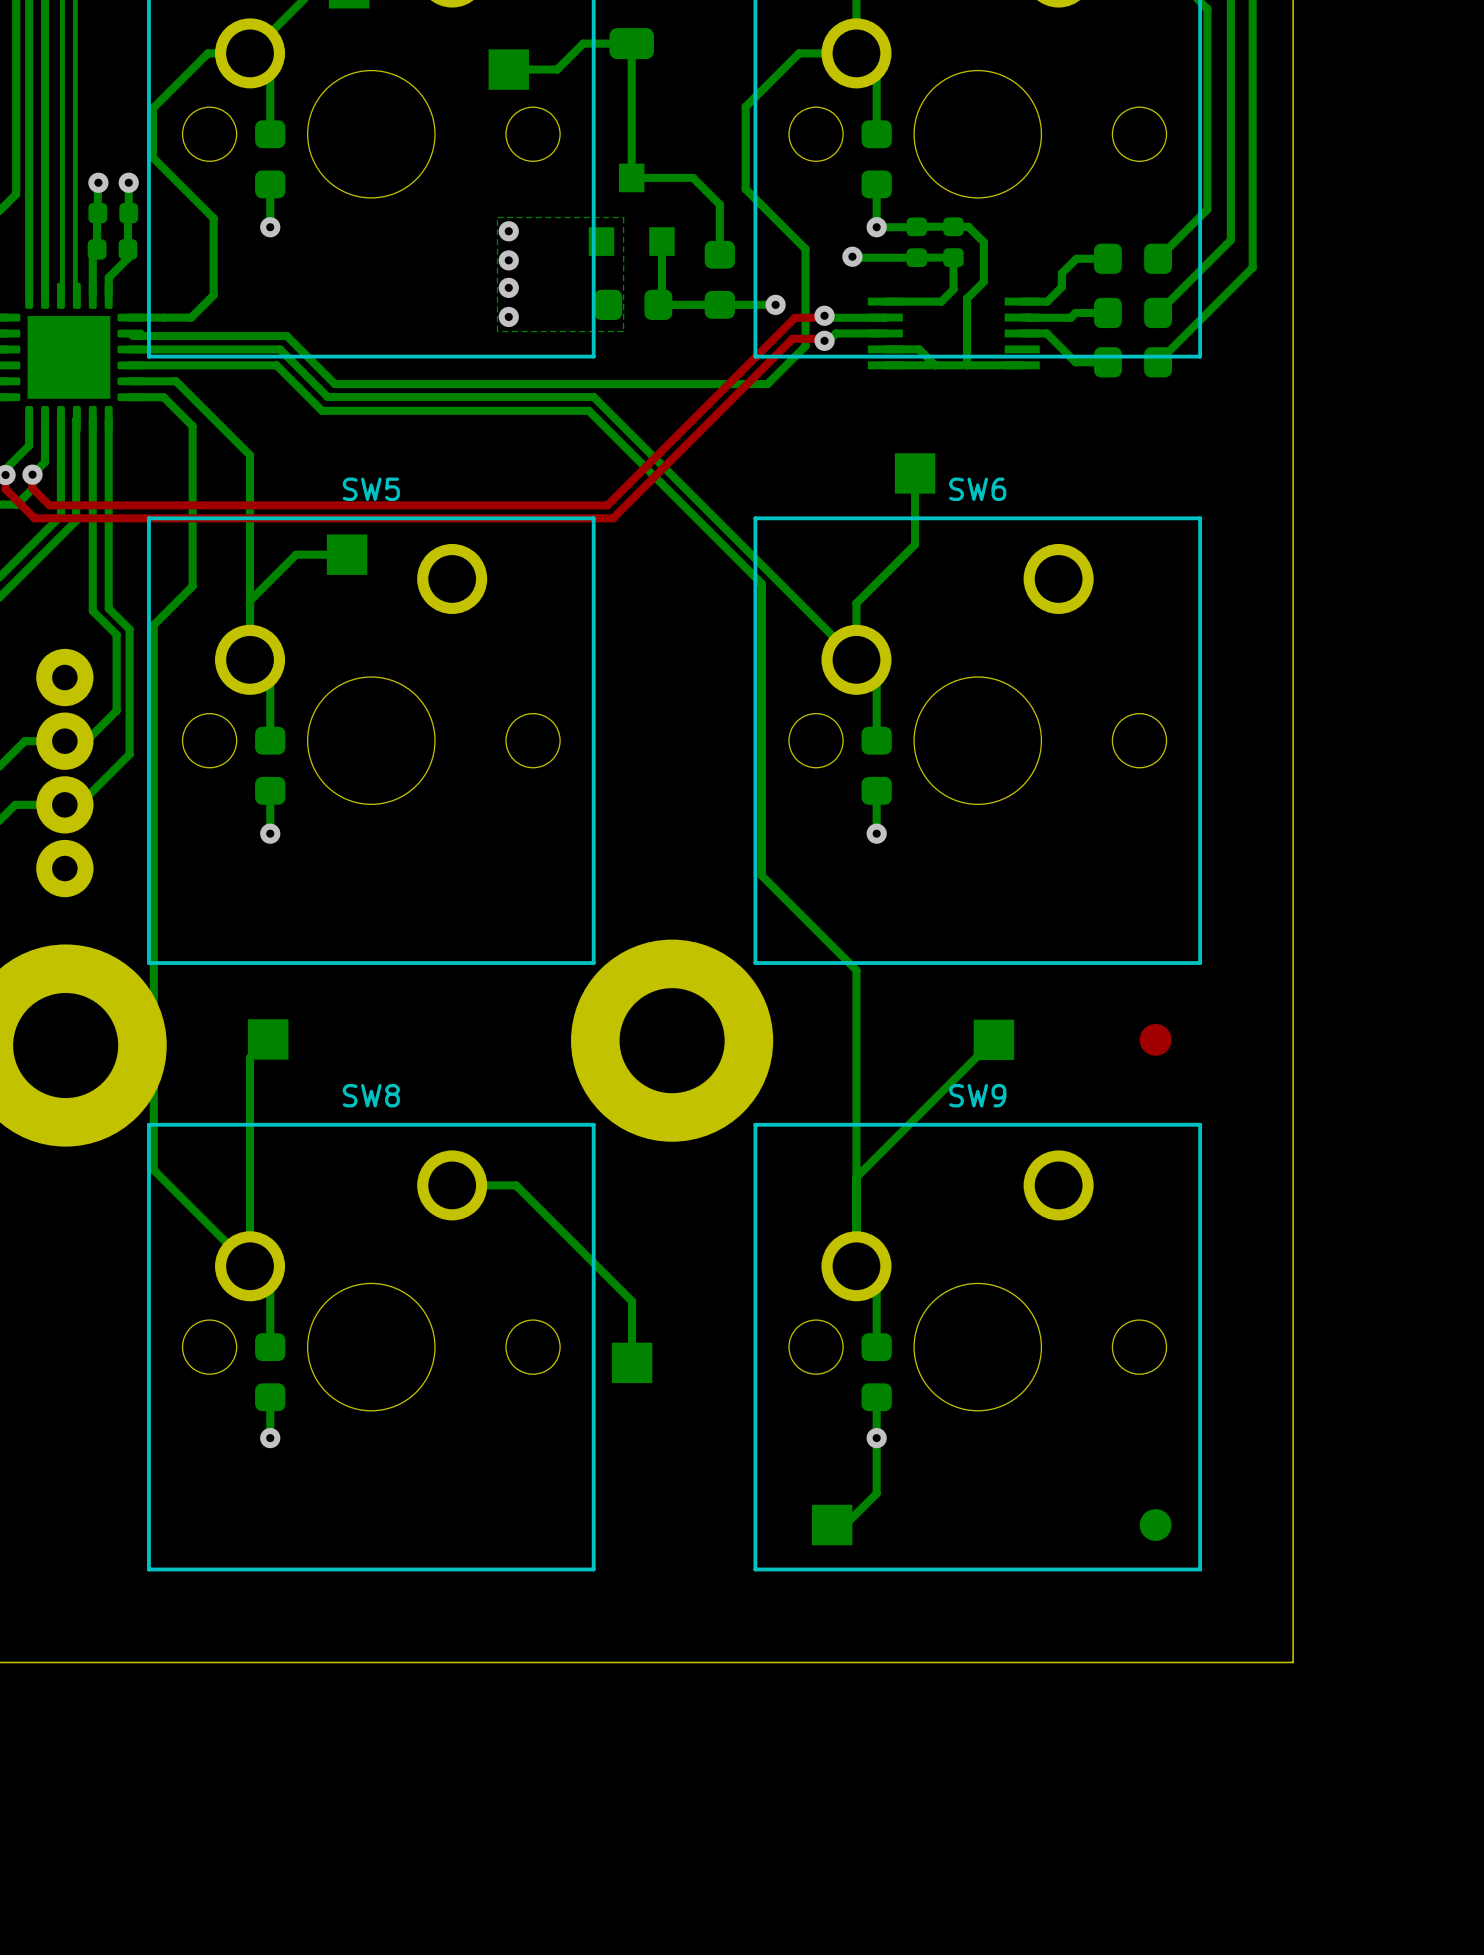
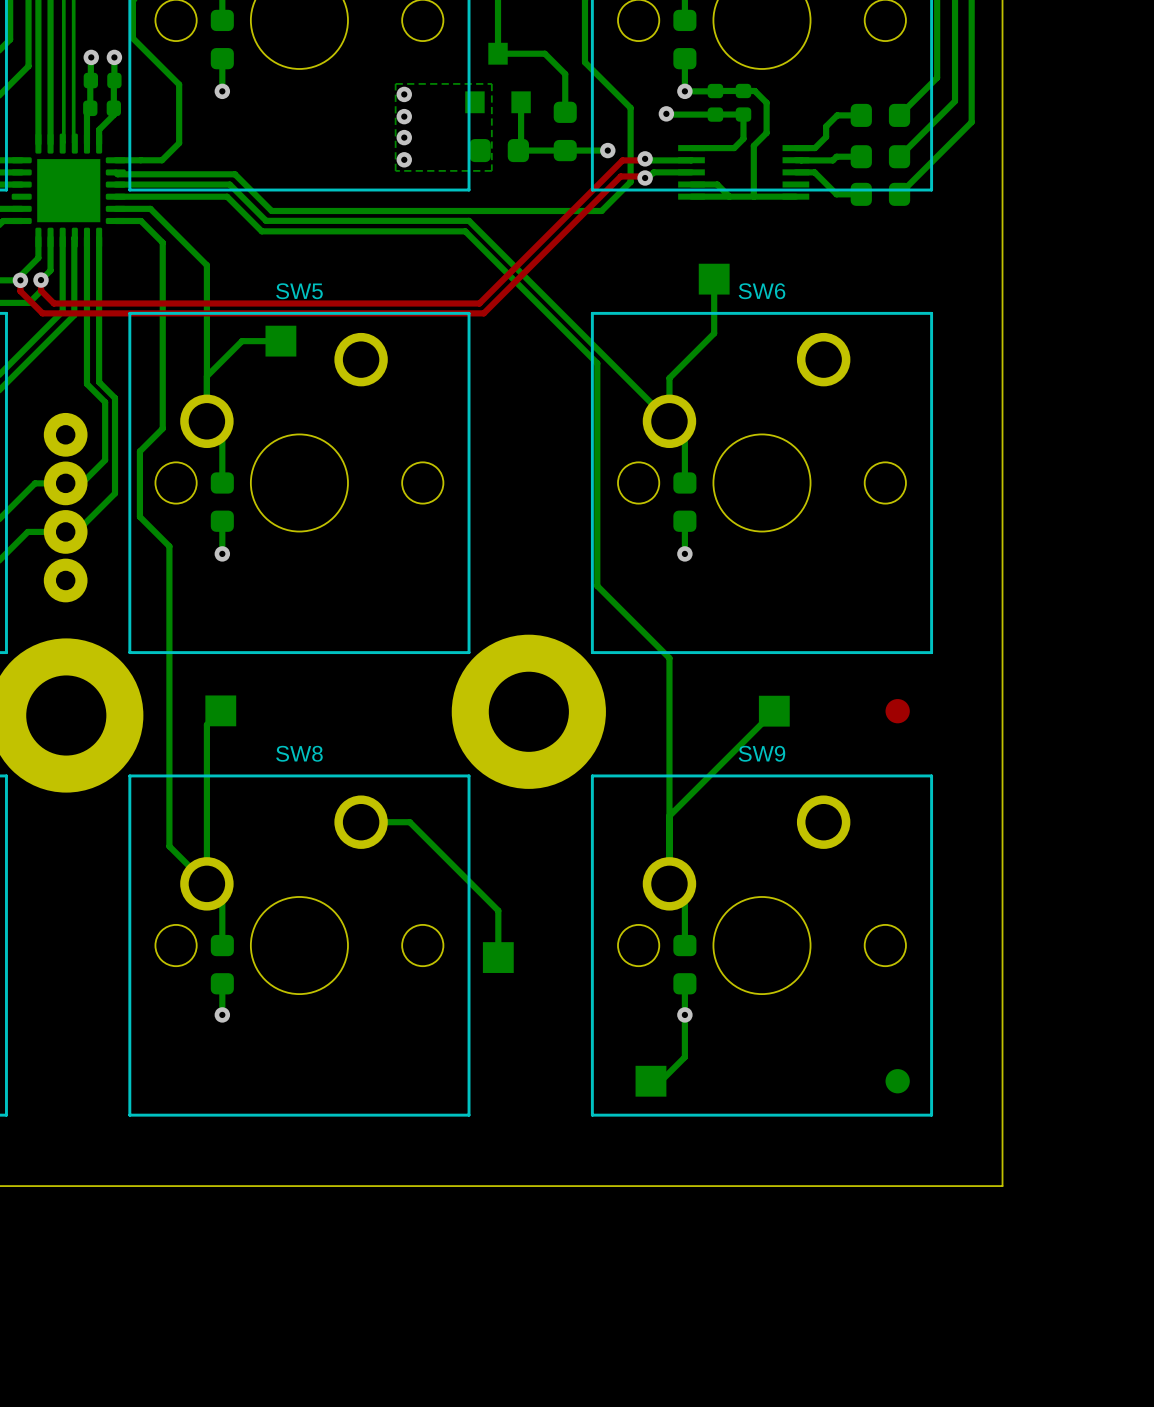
bottom track: (192, 425) (192, 586) (153, 625) (153, 1170) (200, 1217) -> (162, 242) (162, 428) (139, 451) (139, 516) (169, 546) (169, 846)

